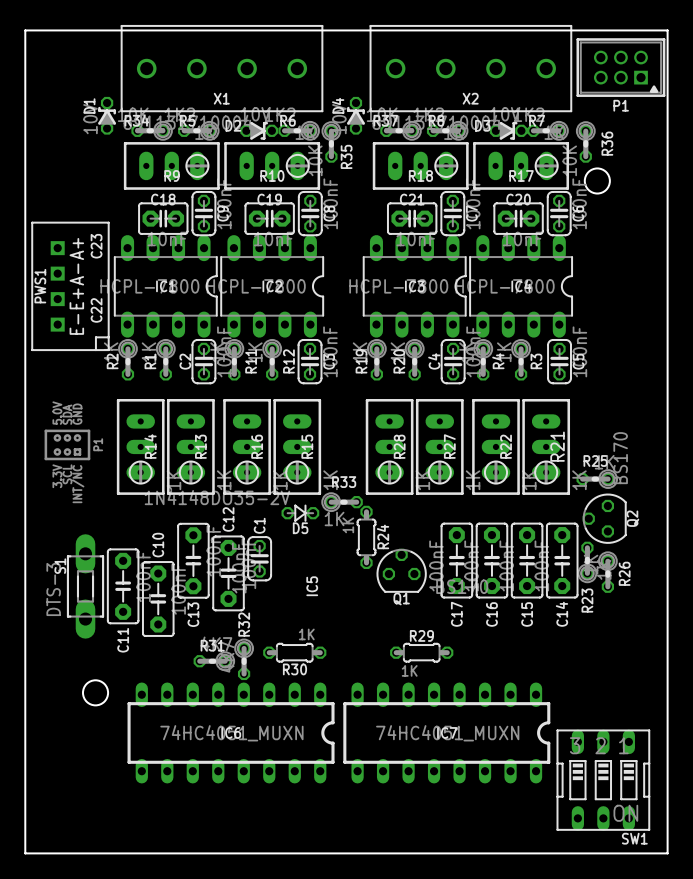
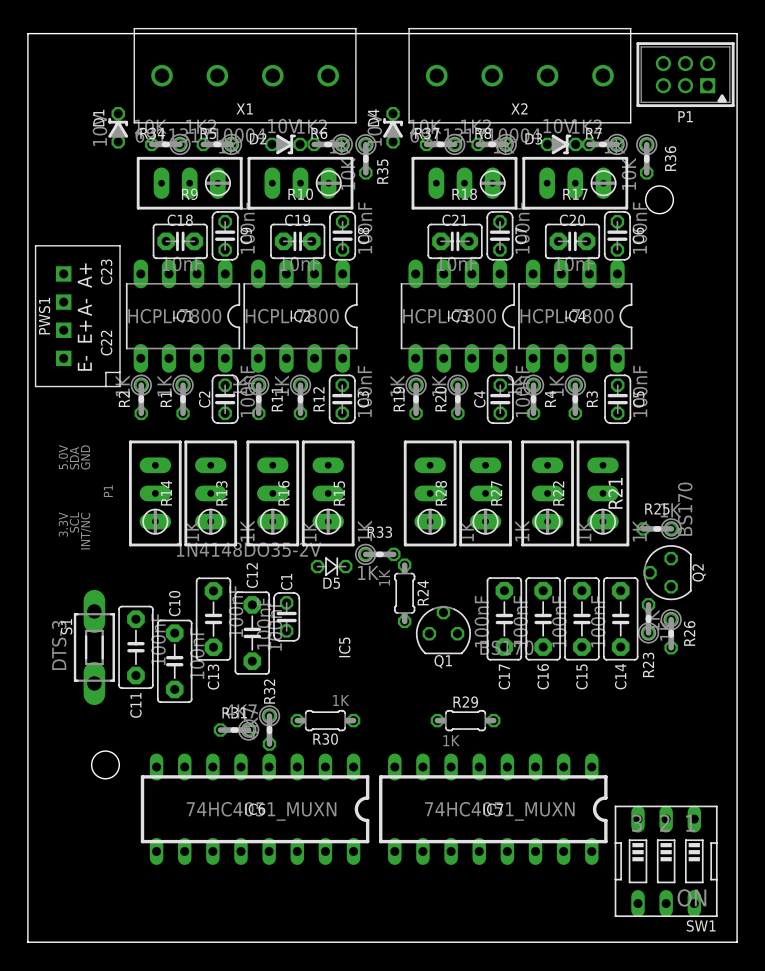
line: (45, 430) (89, 430) (89, 458) (45, 458) (45, 430) -> none
drawing: [53, 434, 82, 456] -> none
line: (74, 449) (79, 449) (79, 454) (74, 454) (74, 449) -> none

